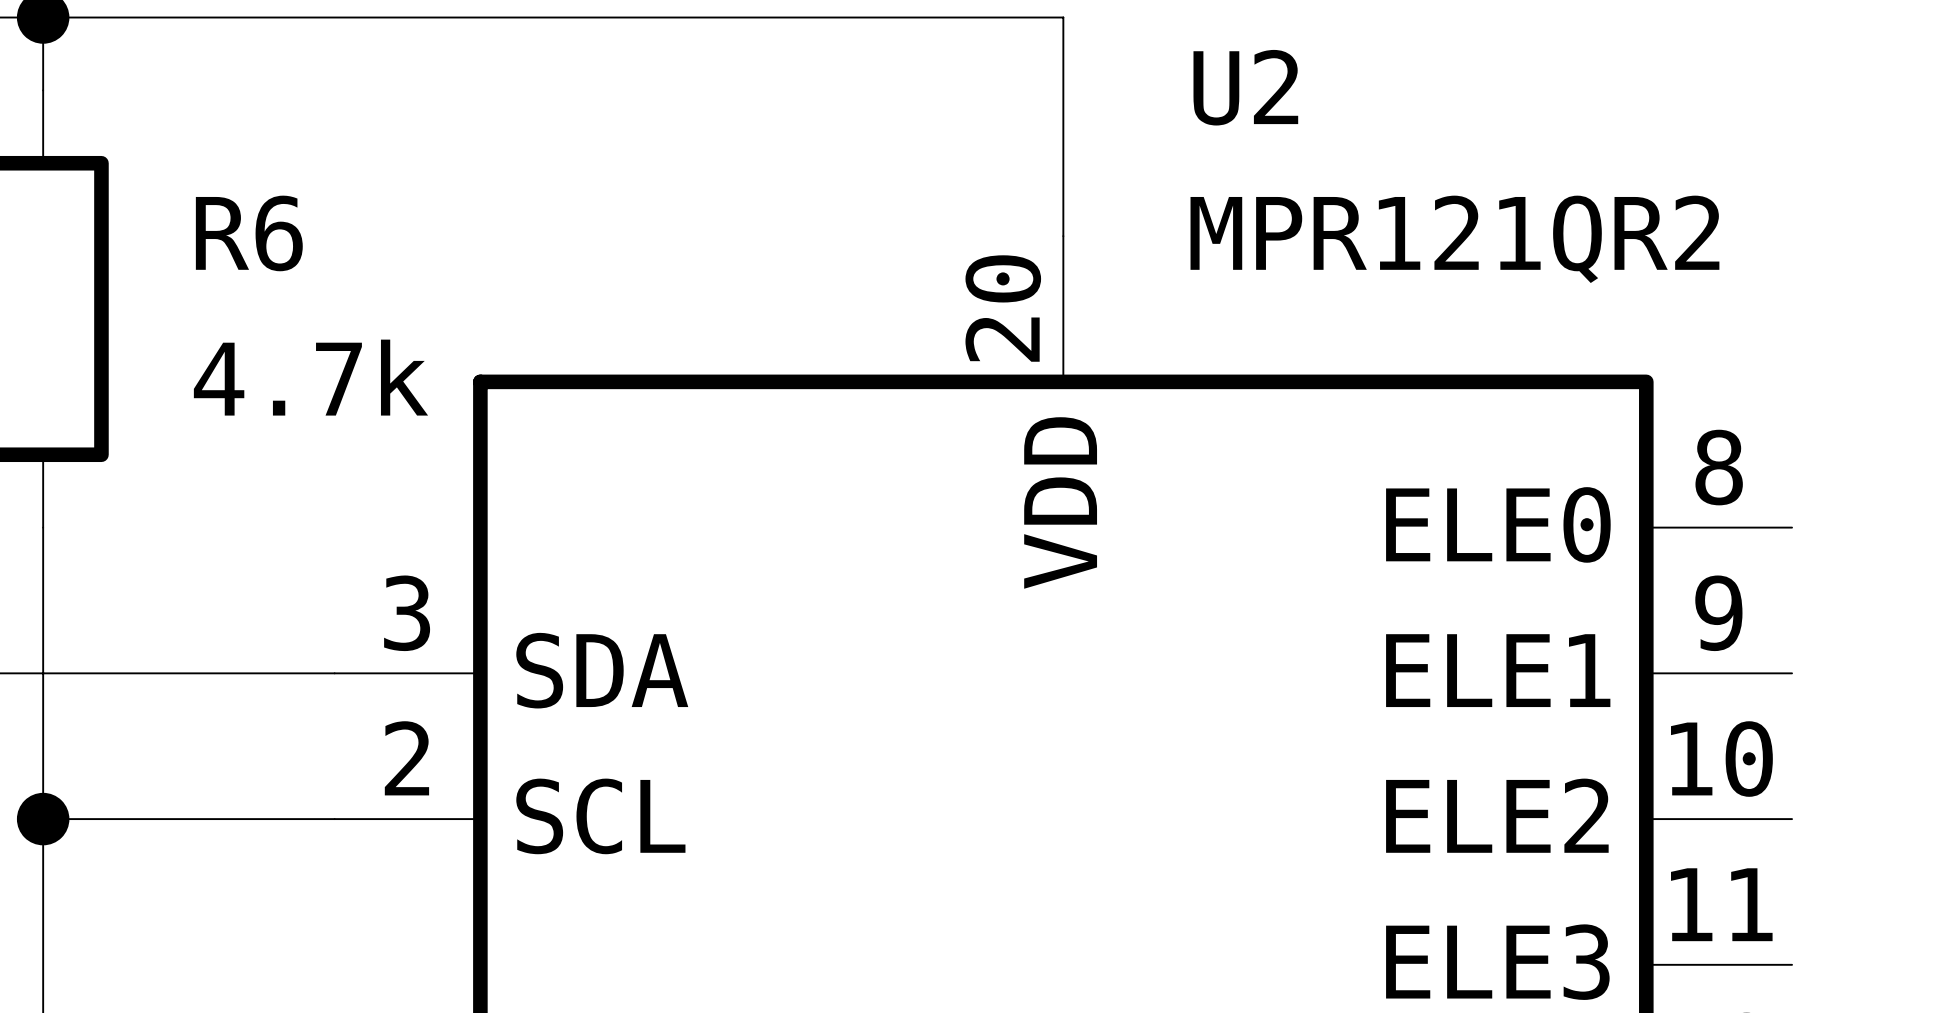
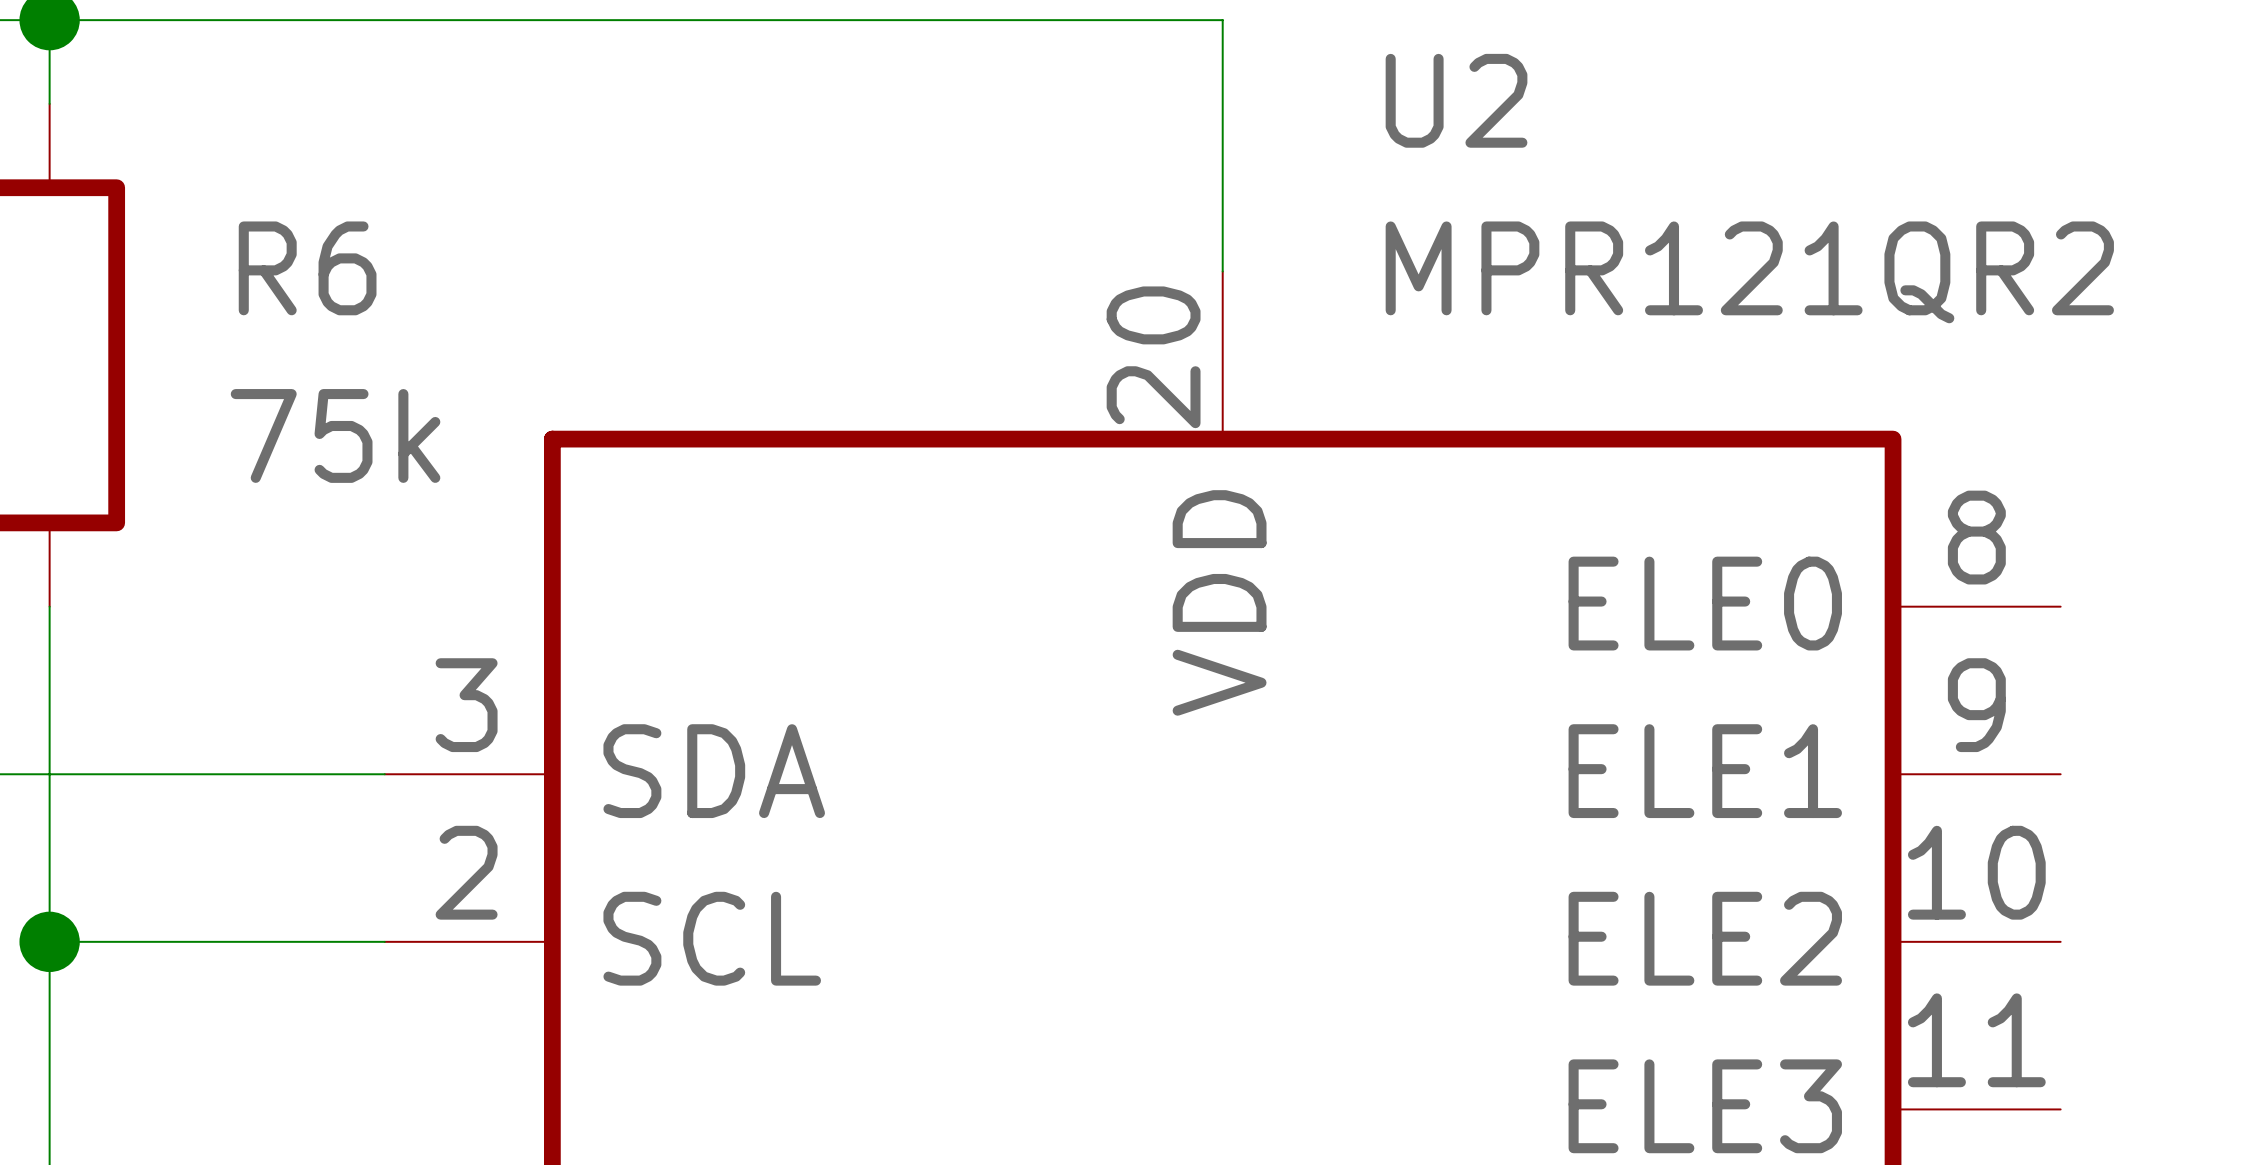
R6 value: 4.7k (310, 377) -> 75k (335, 435)

